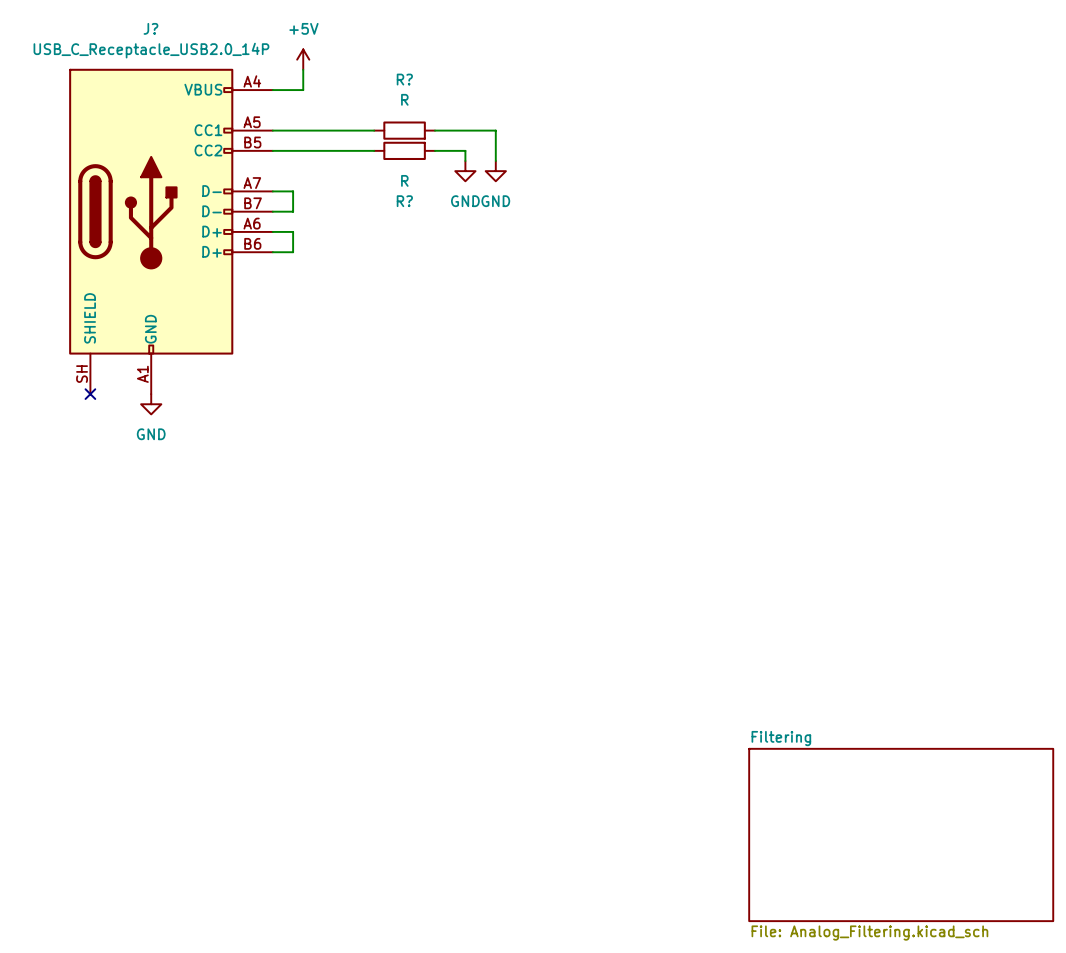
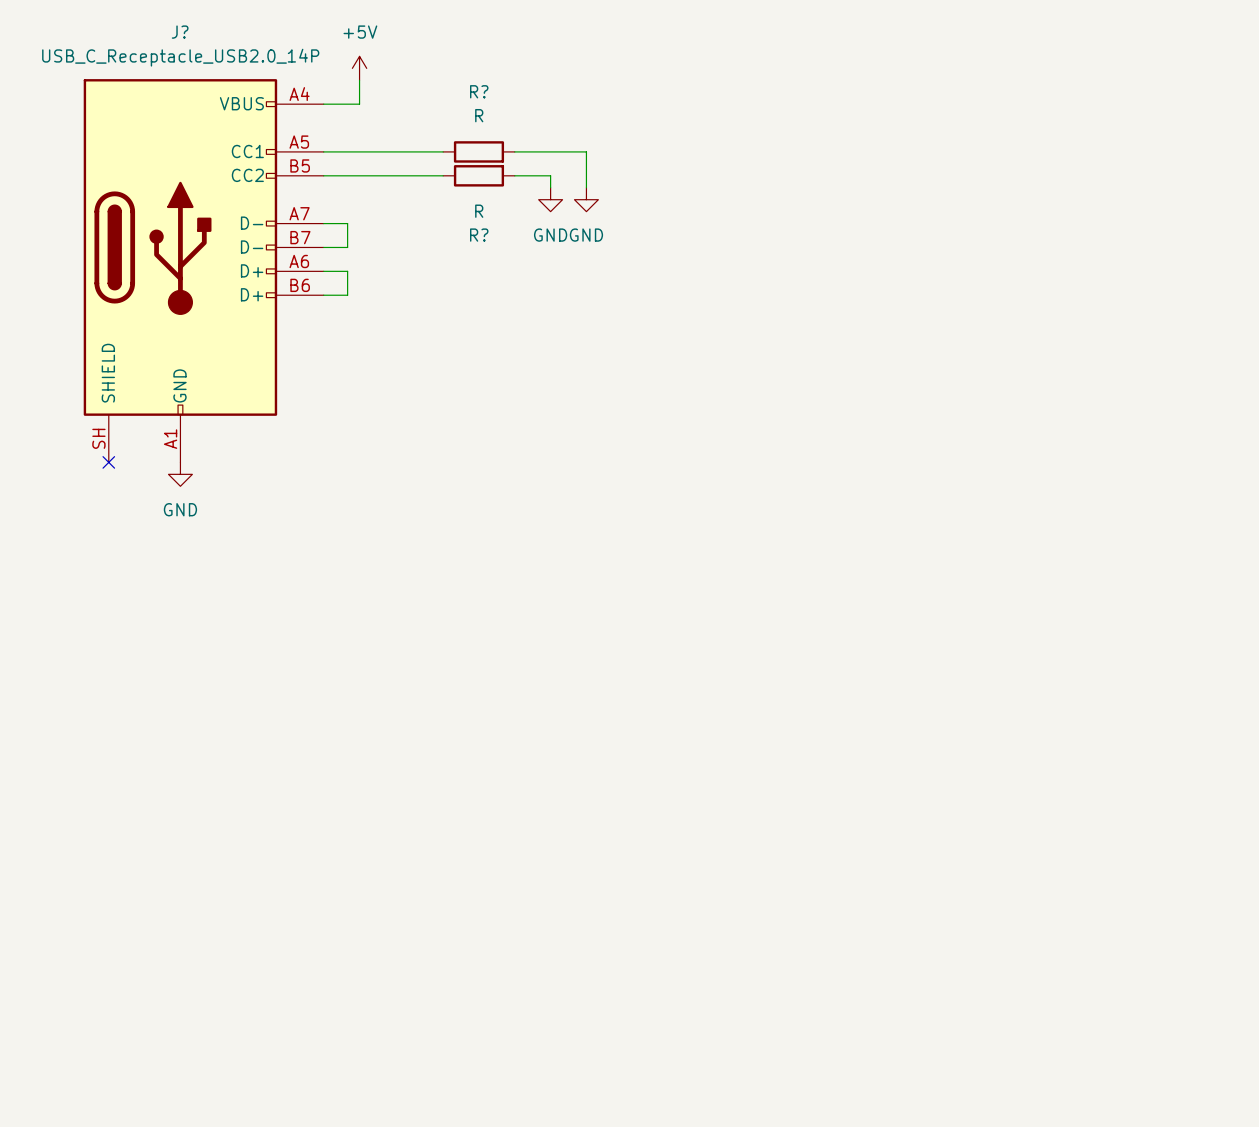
sheet Filtering: File: Analog_Filtering.kicad_sch (901, 834) -> none

